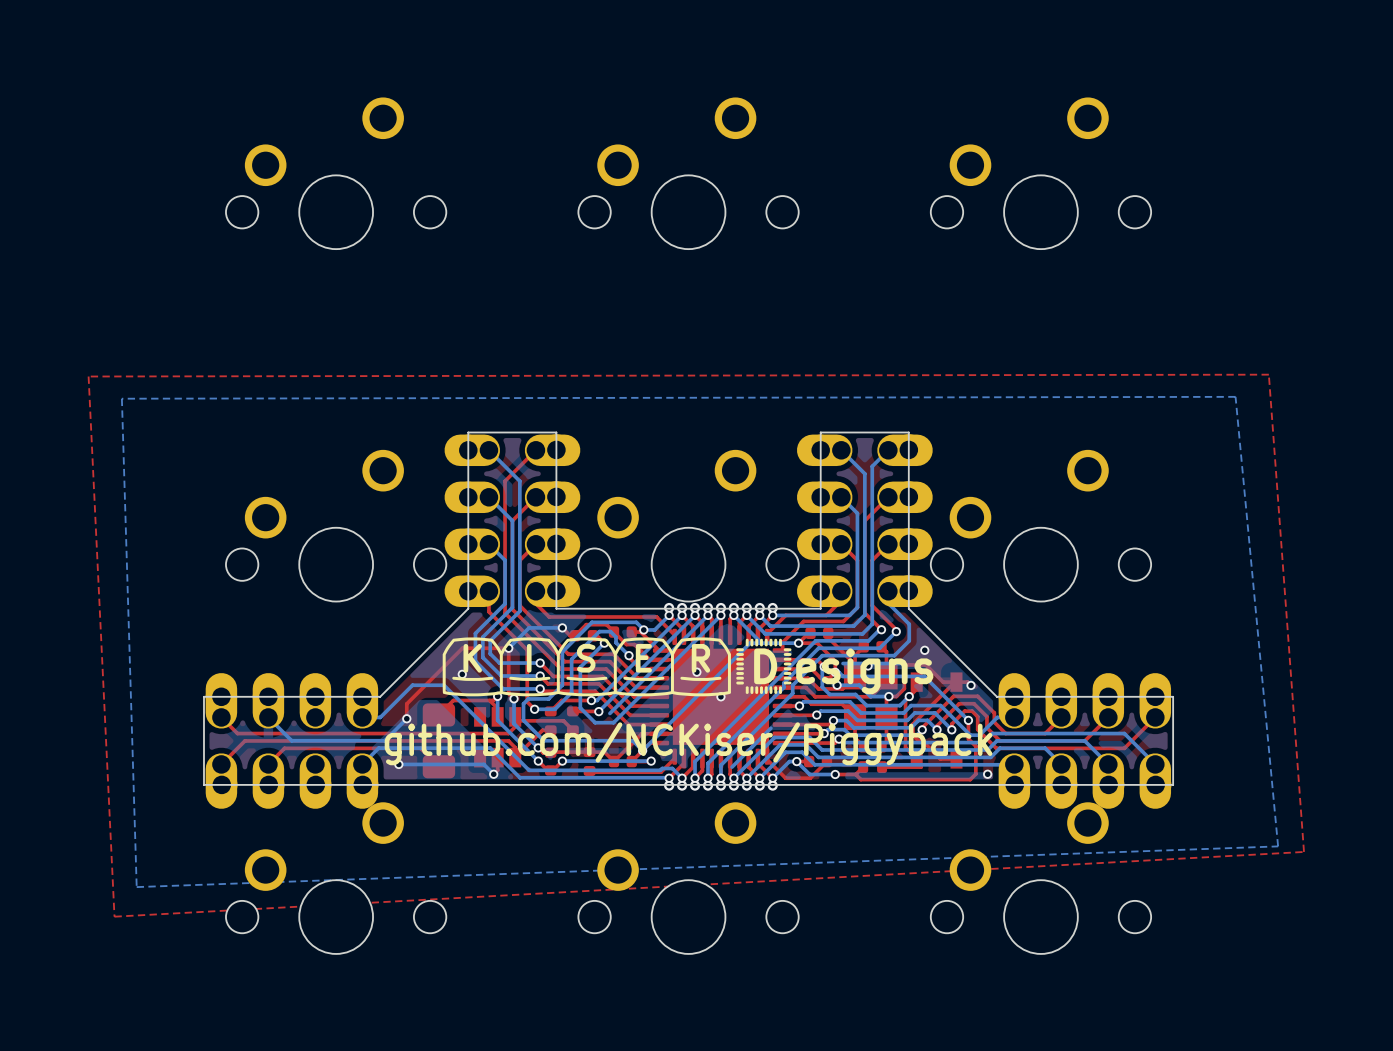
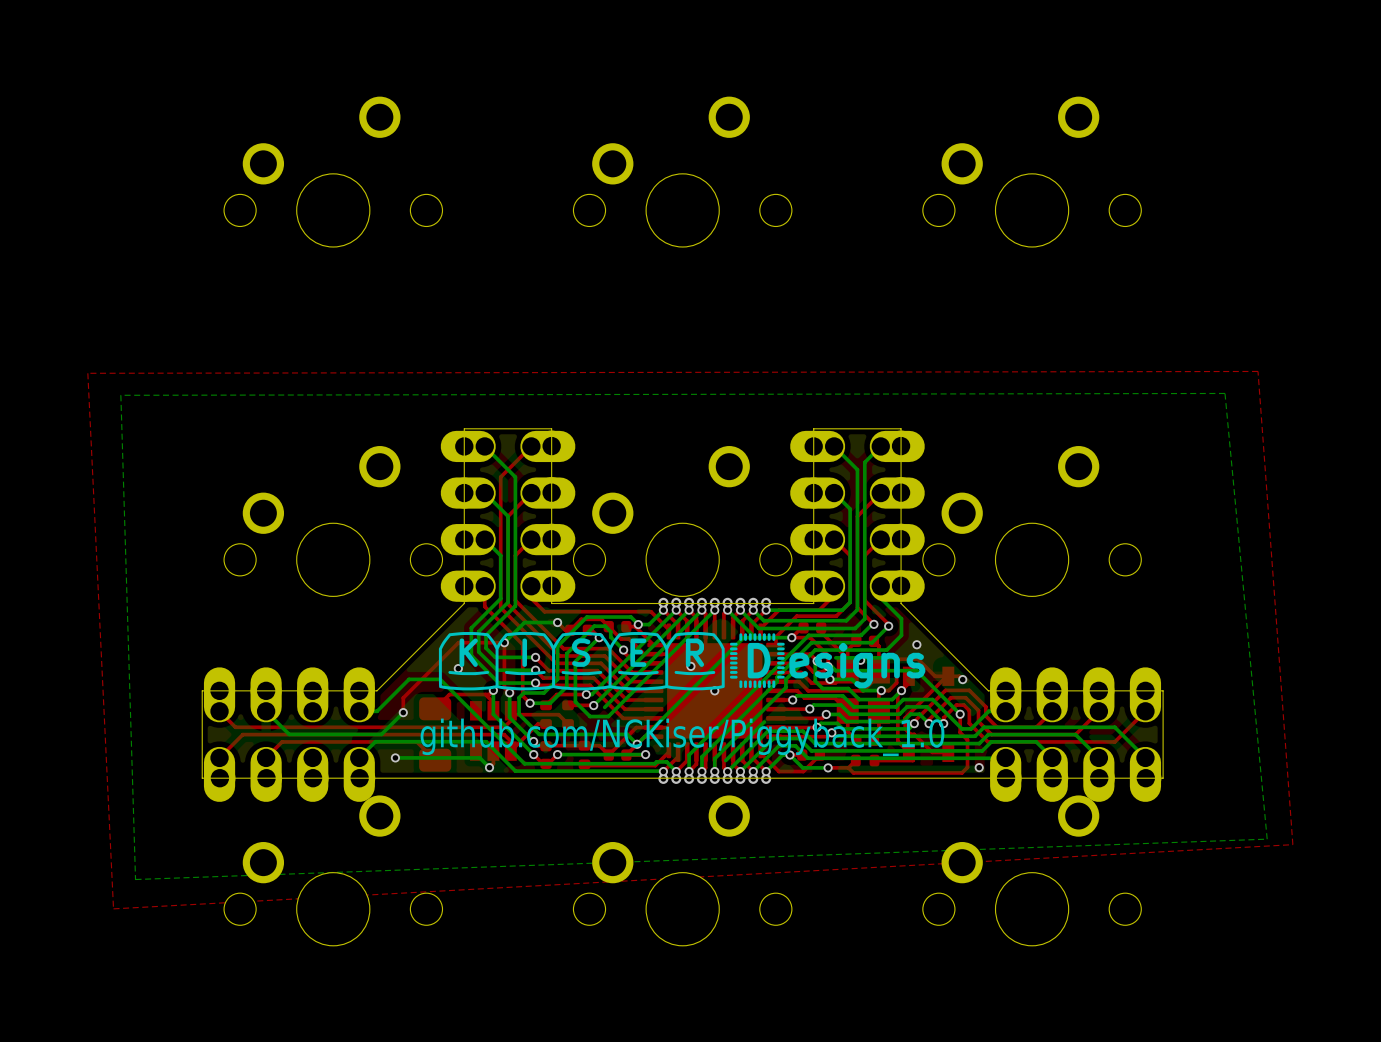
text: github.com/NCKiser/Piggyback (688, 743) -> github.com/NCKiser/Piggyback_1.0 (682, 737)

